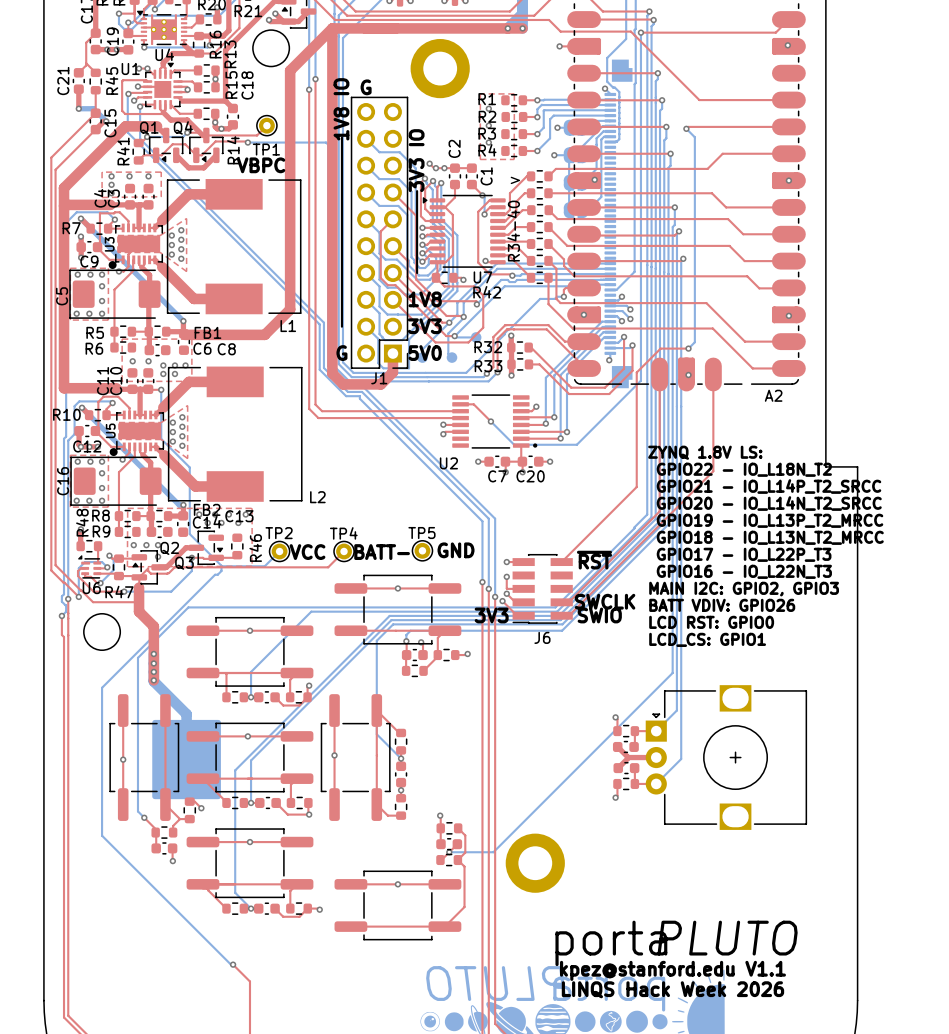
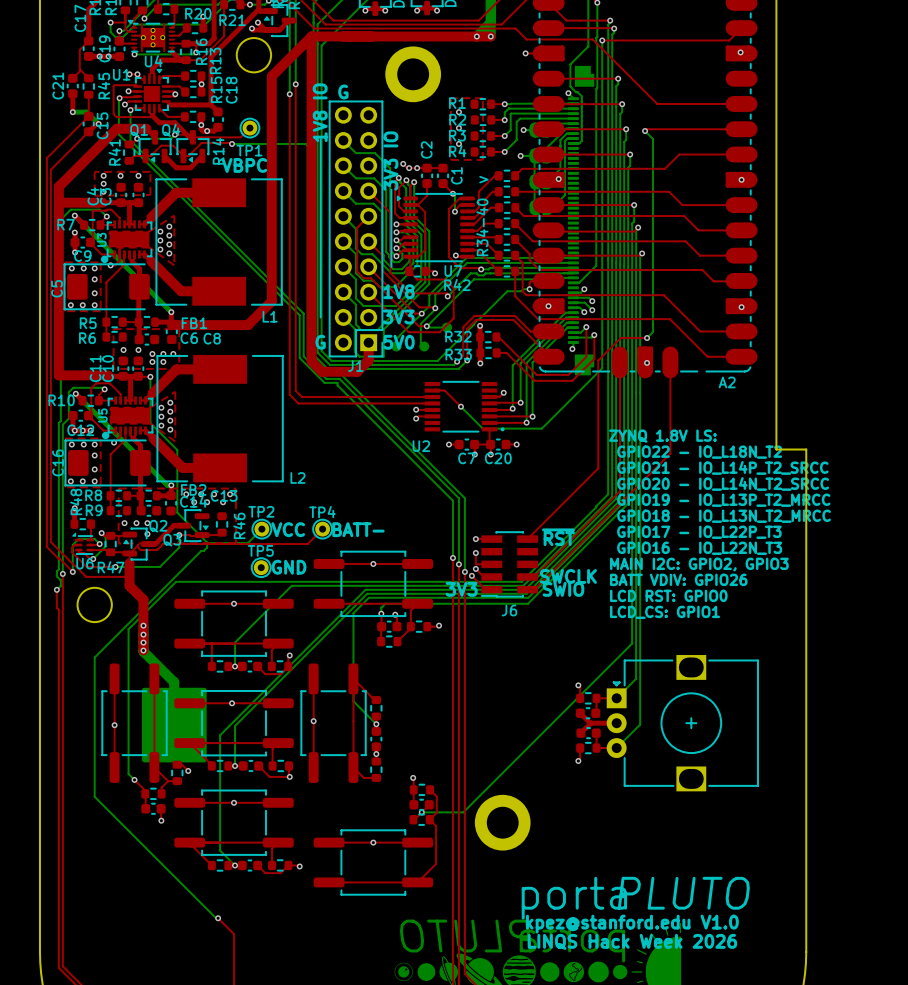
TP5 position: (422, 550) -> (261, 567)
text position: GND (456, 550) -> GND (289, 567)
text: kpez@stanford.edu V1.1 (672, 970) -> kpez@stanford.edu V1.0 (632, 924)

